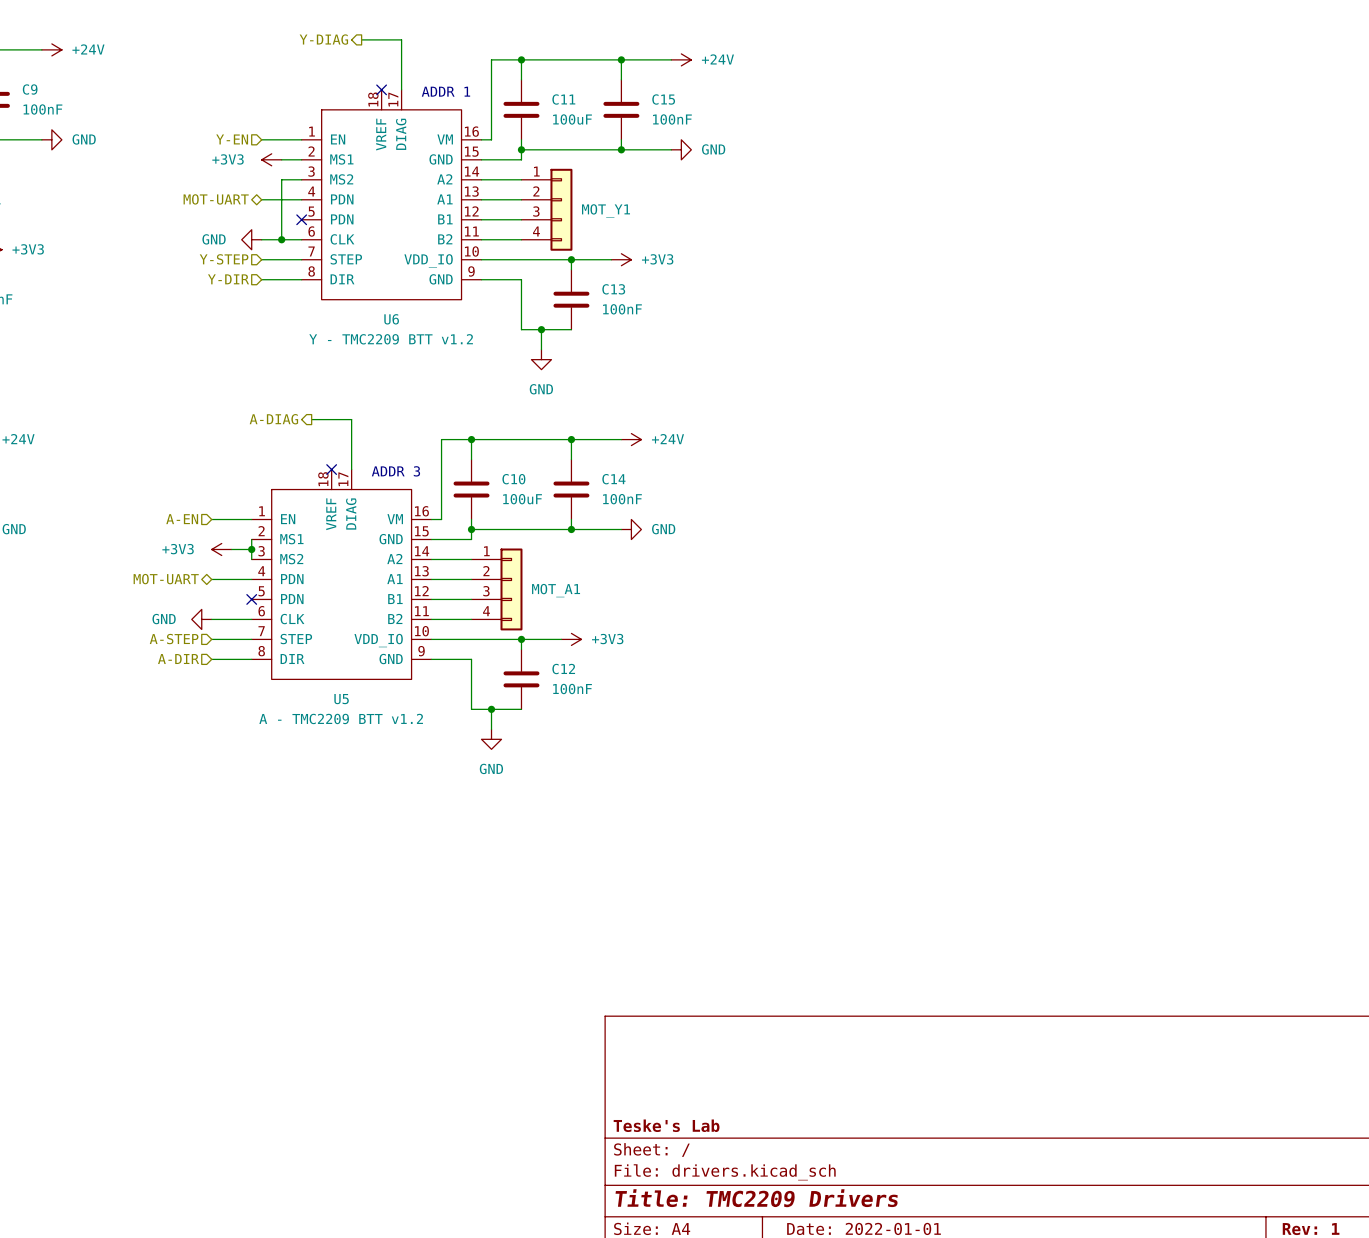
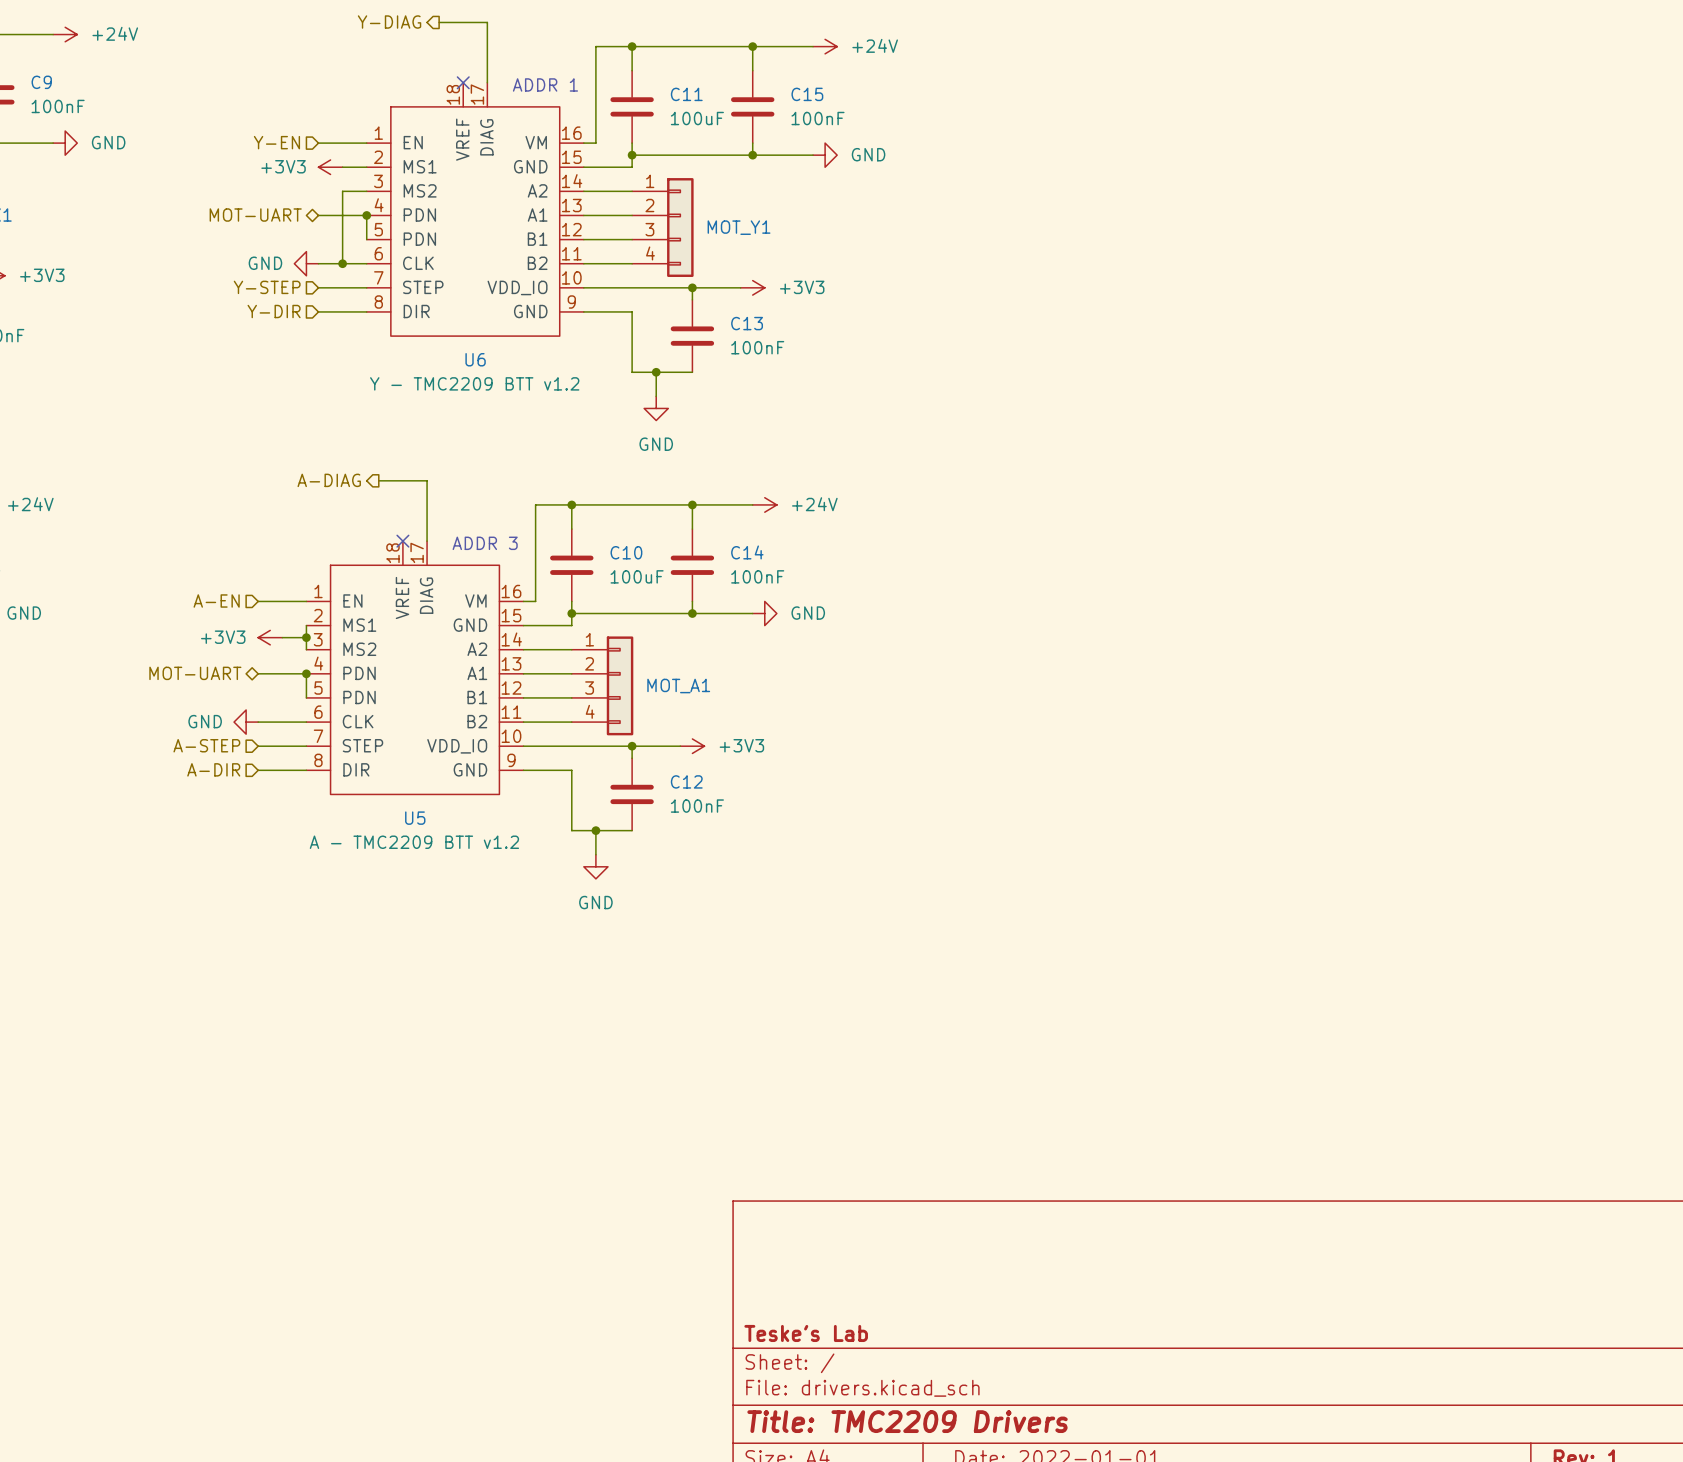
wire: none -> (366, 215) (366, 239)
junction: none -> (366, 215)
no-connect mark: (301, 219) -> none
wire: none -> (306, 673) (306, 697)
junction: none -> (306, 673)
no-connect mark: (251, 599) -> none

